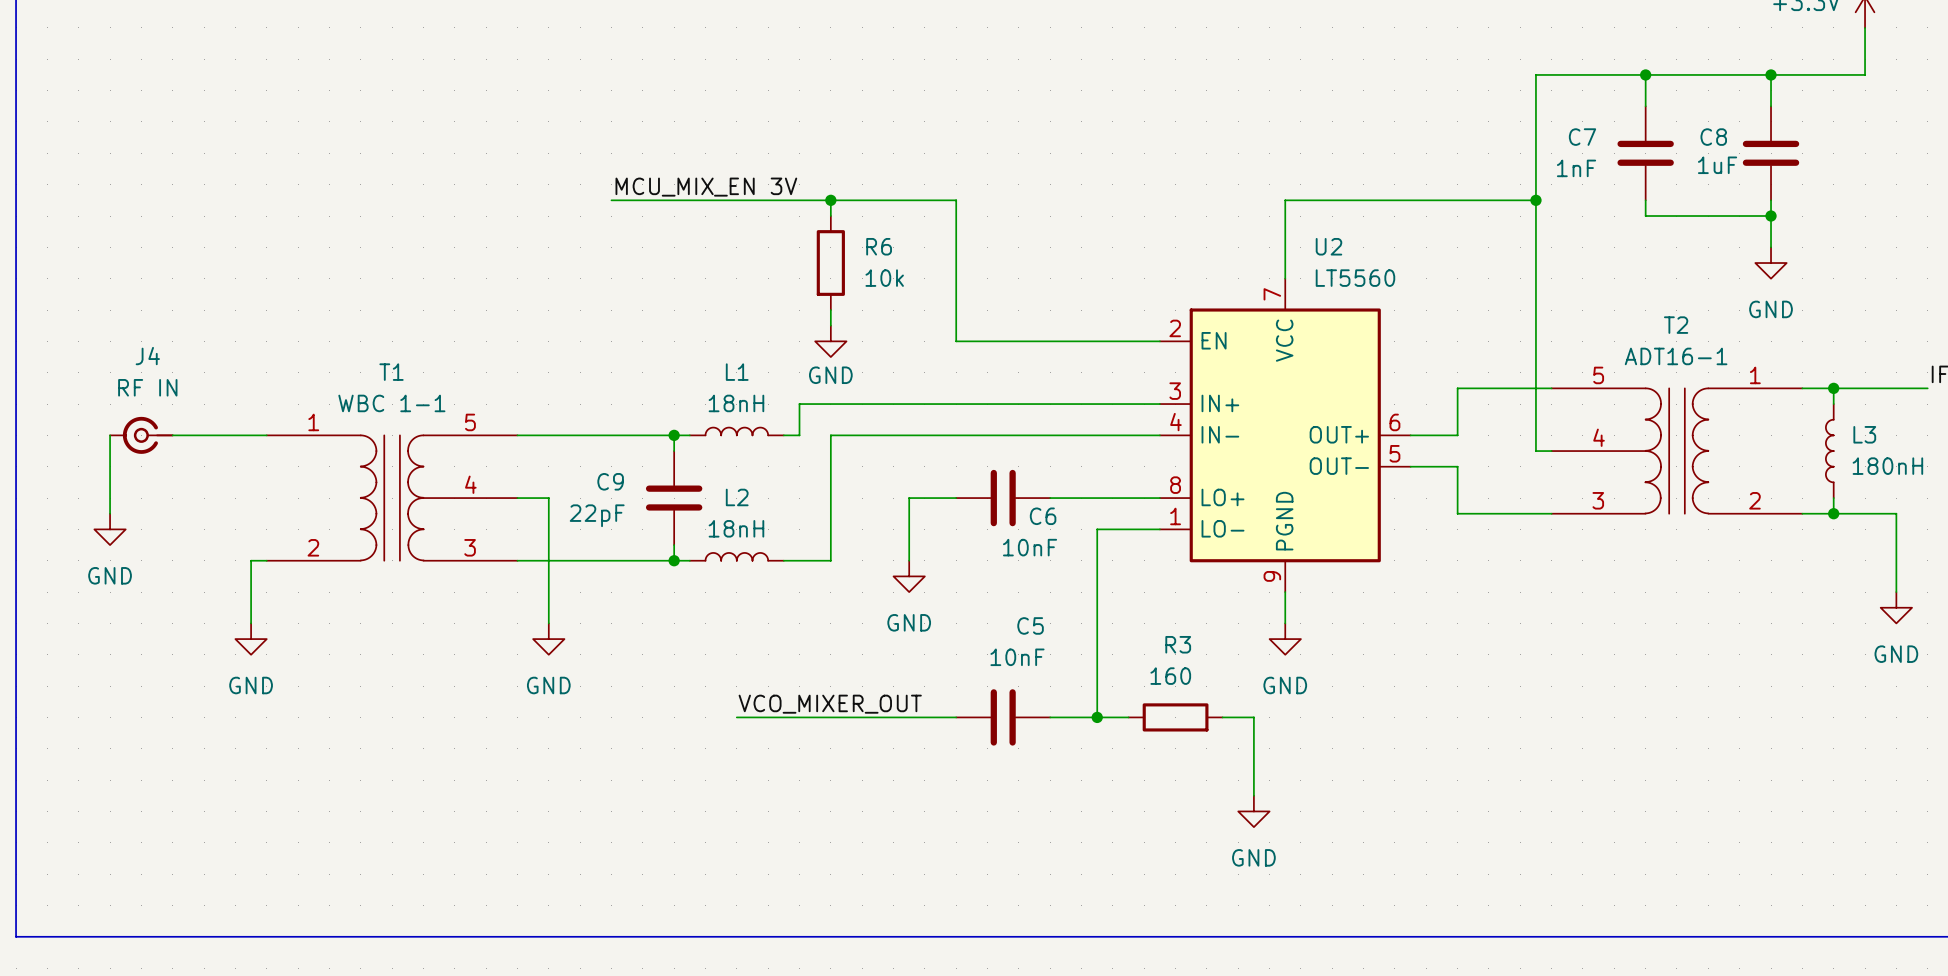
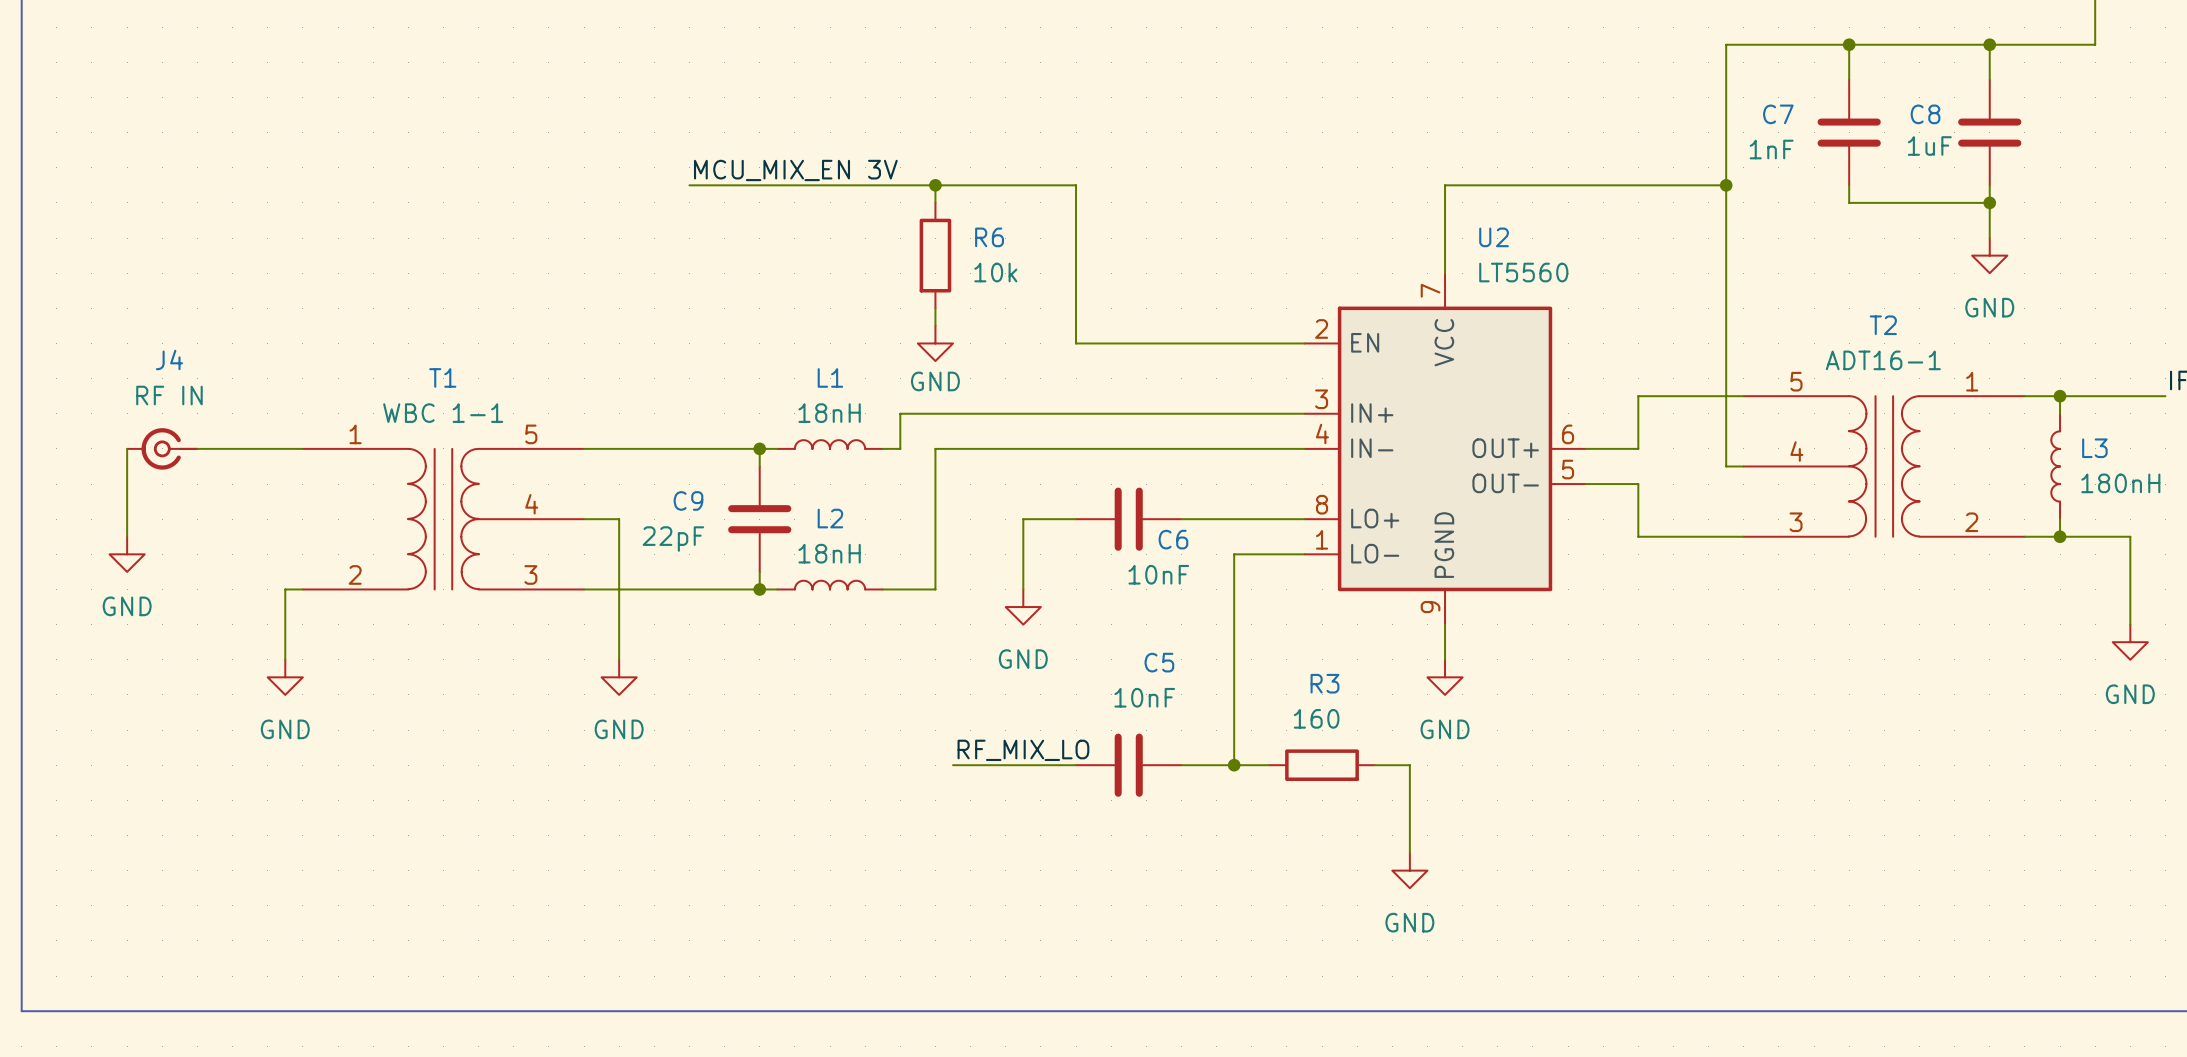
label: VCO_MIXER_OUT (830, 704) -> none
label: none -> RF_MIX_LO (1023, 750)
wire: (736, 717) (846, 717) -> none

